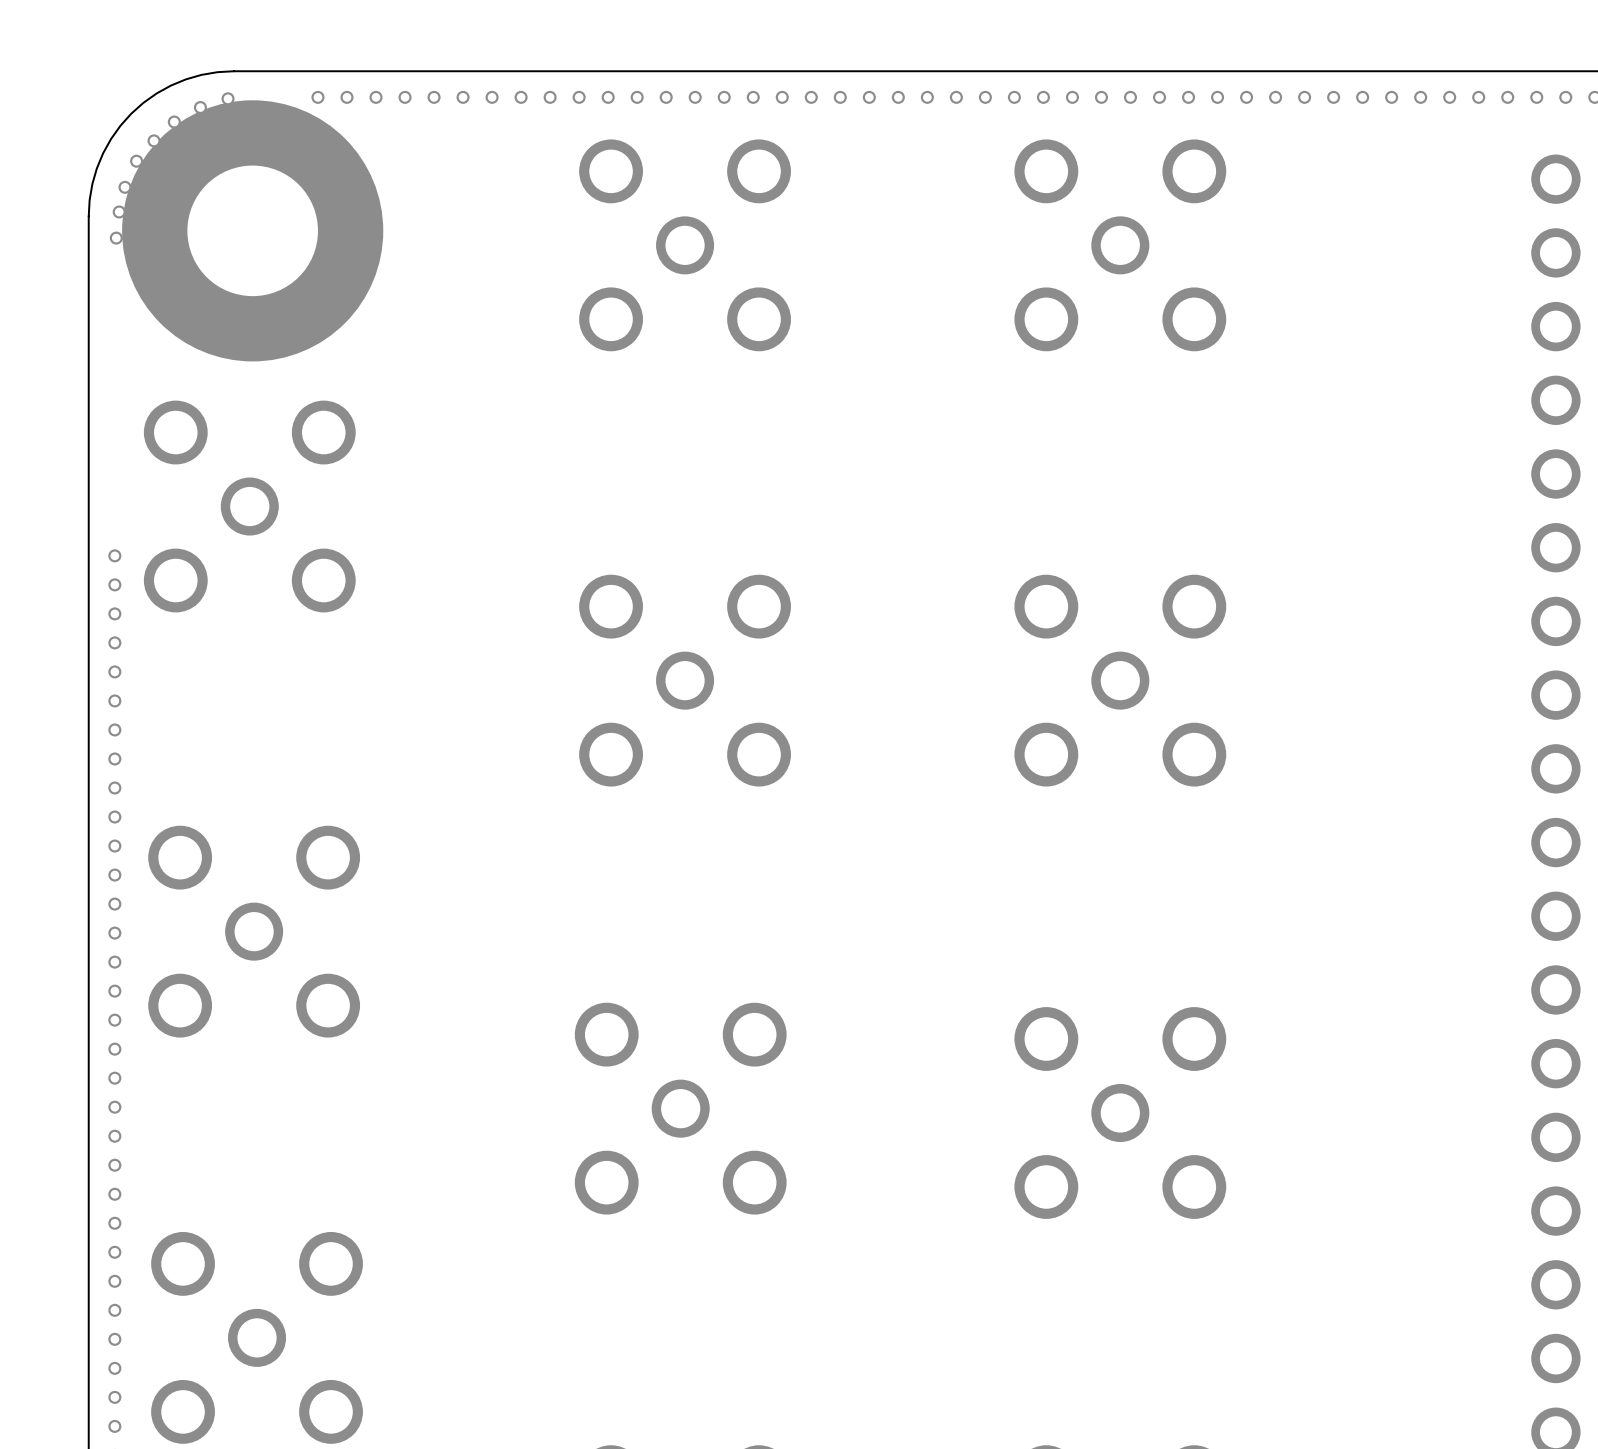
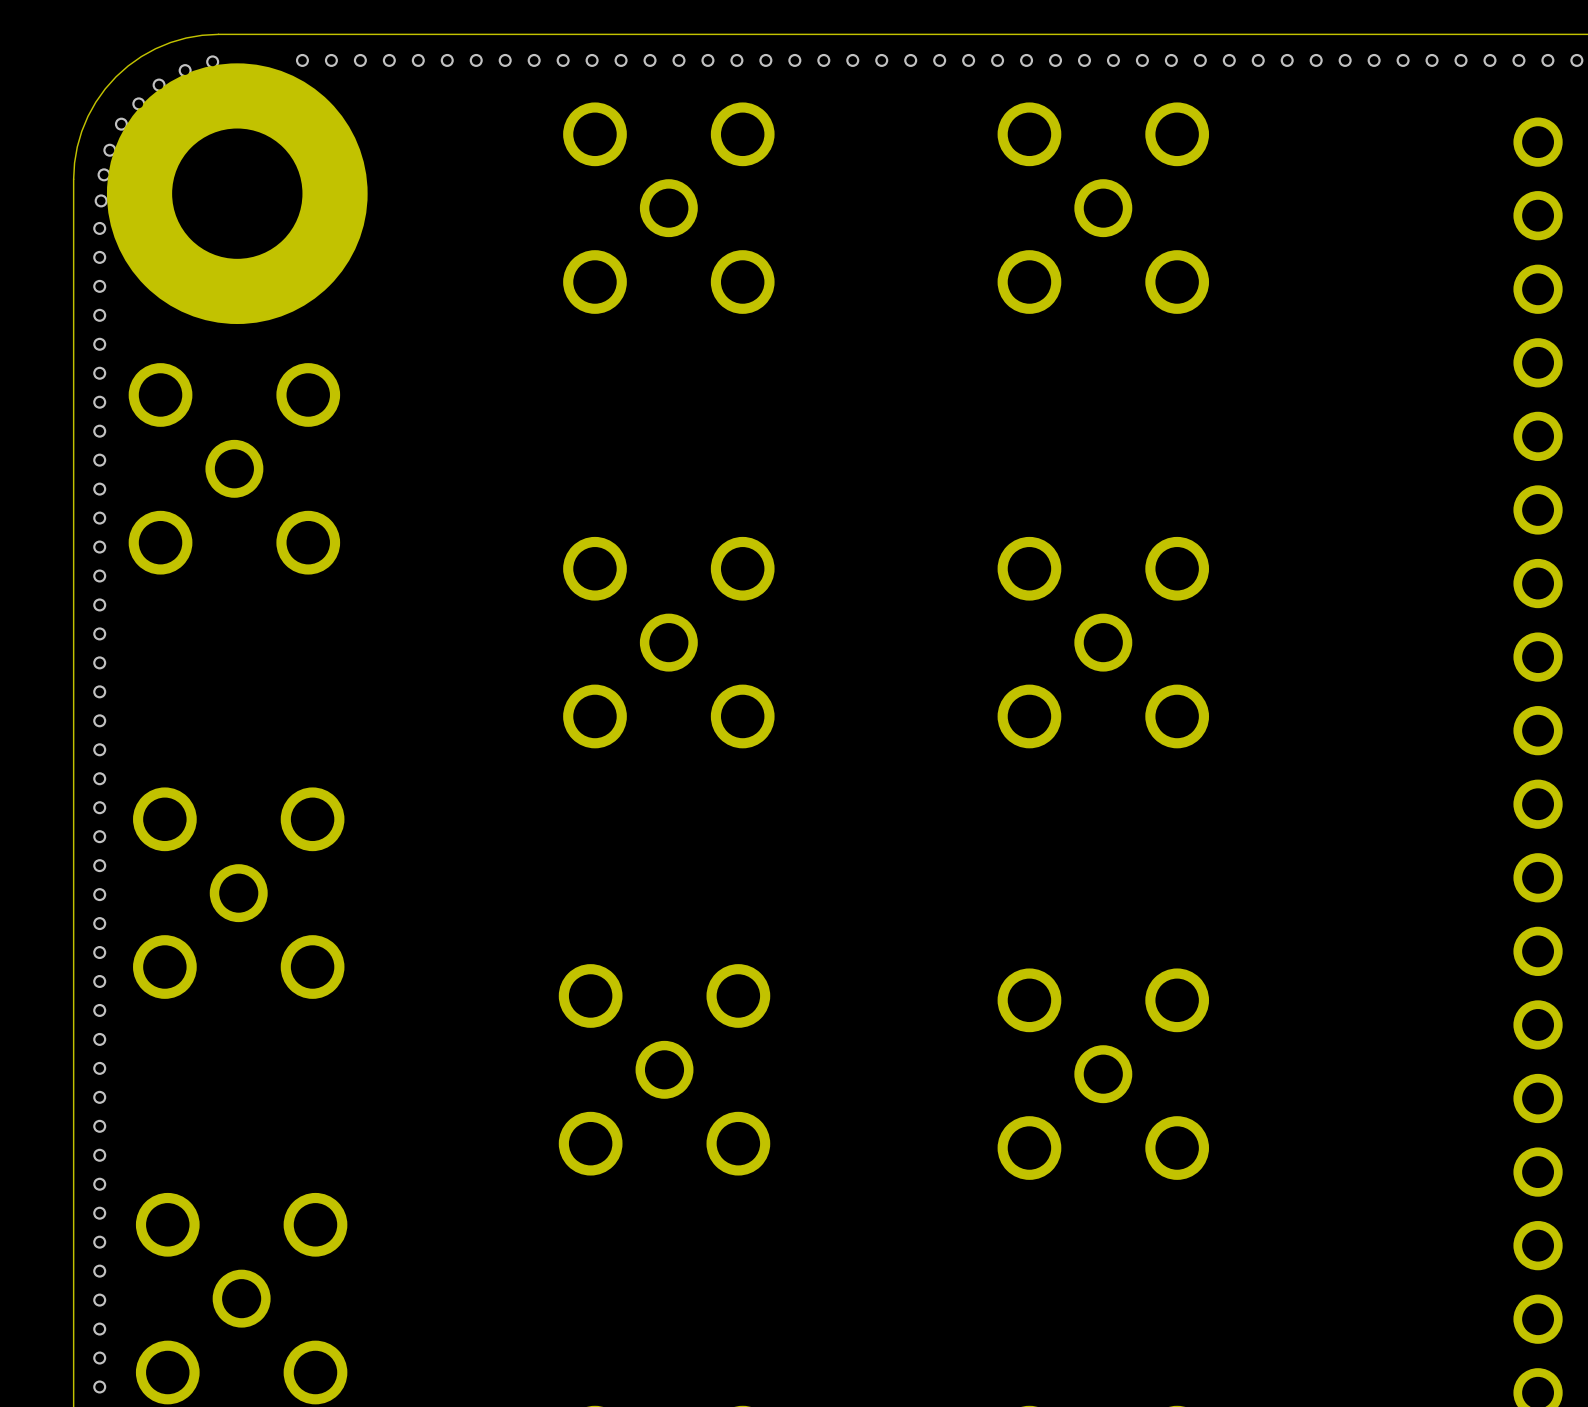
via: none -> (99, 228)
via: none -> (99, 257)
via: none -> (99, 286)
via: none -> (99, 315)
via: none -> (99, 344)
via: none -> (99, 373)
via: none -> (99, 402)
via: none -> (99, 431)
via: none -> (99, 460)
via: none -> (99, 489)

